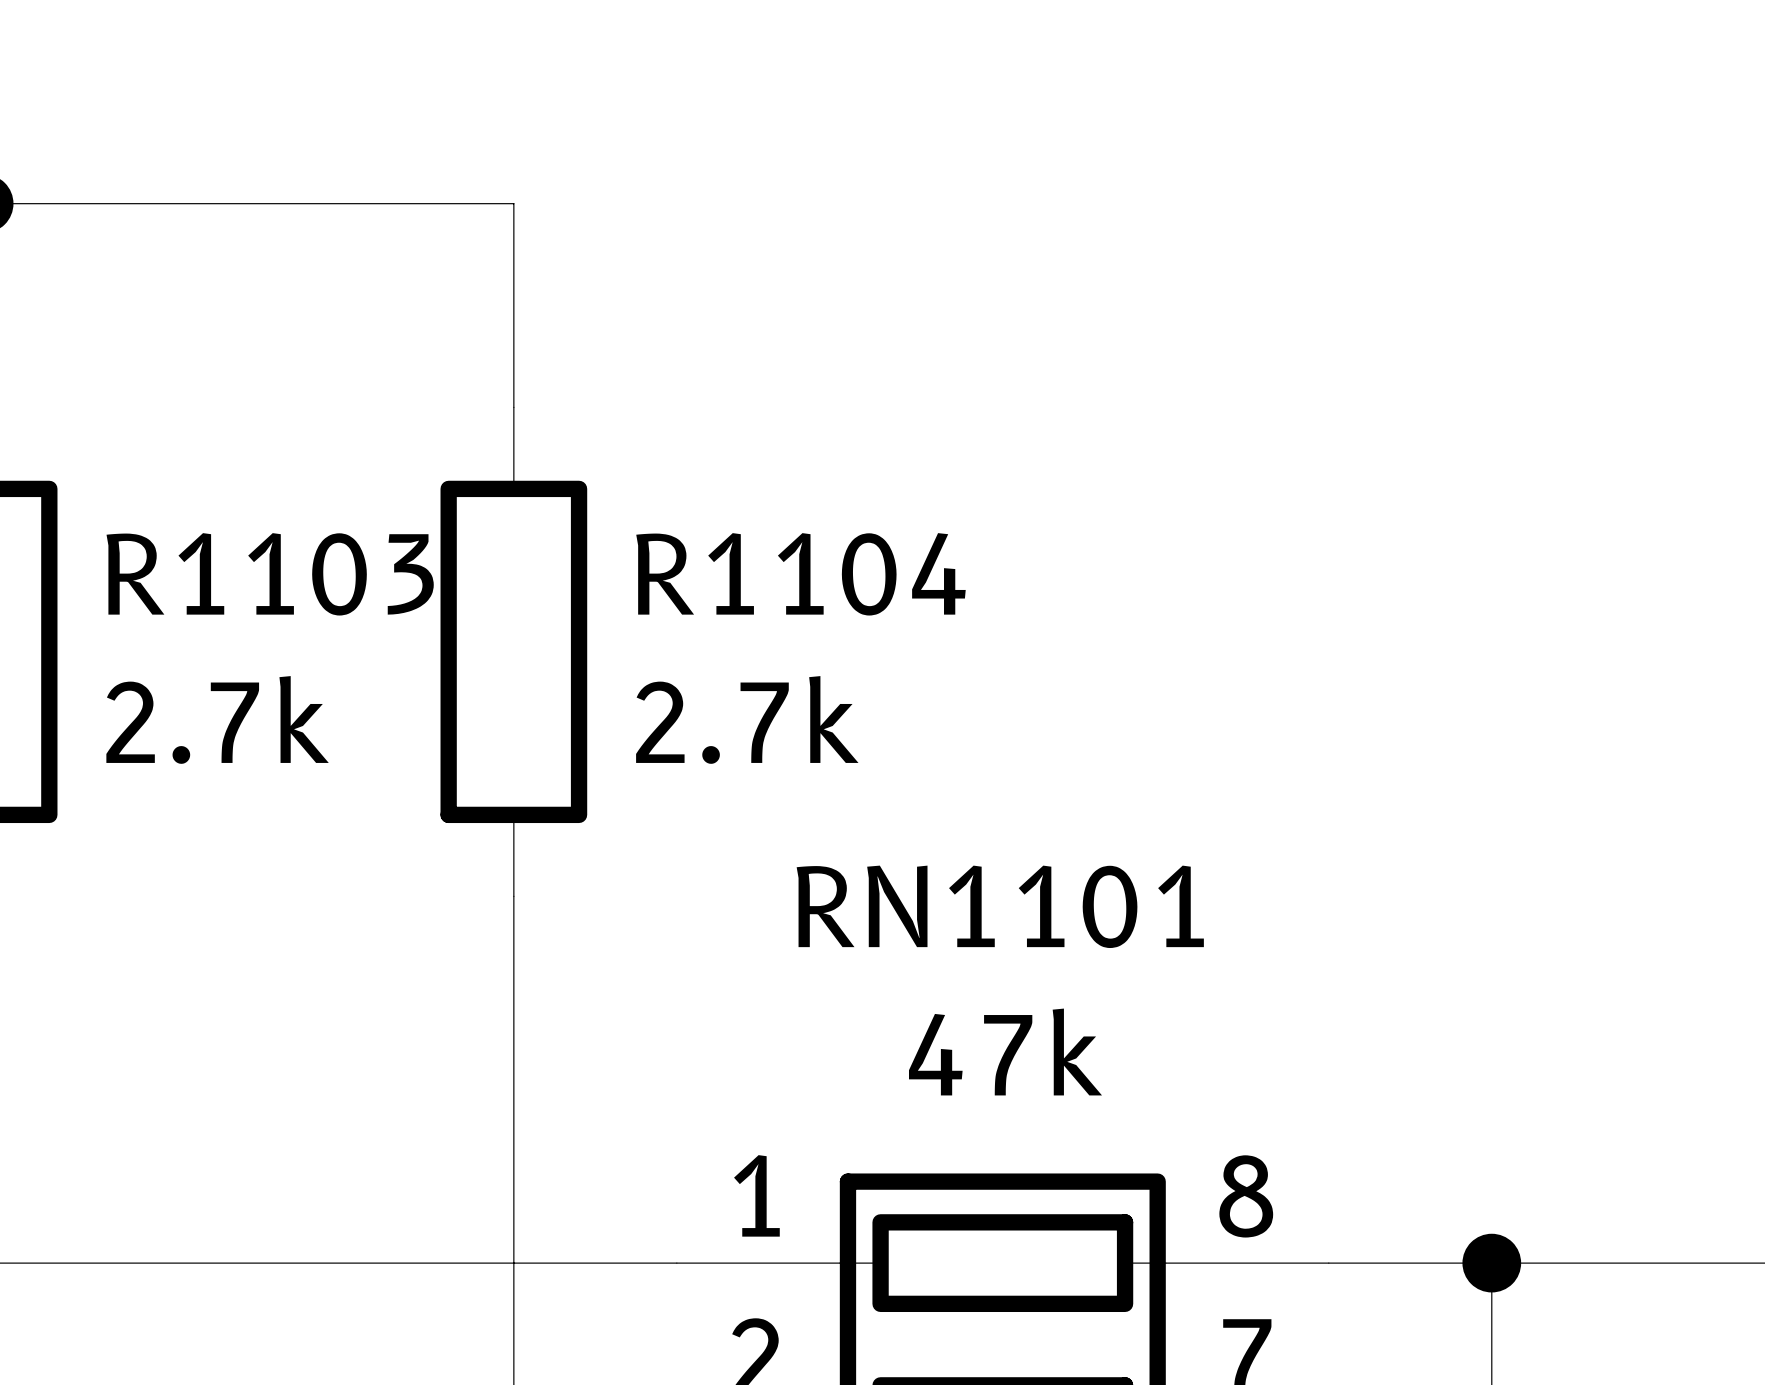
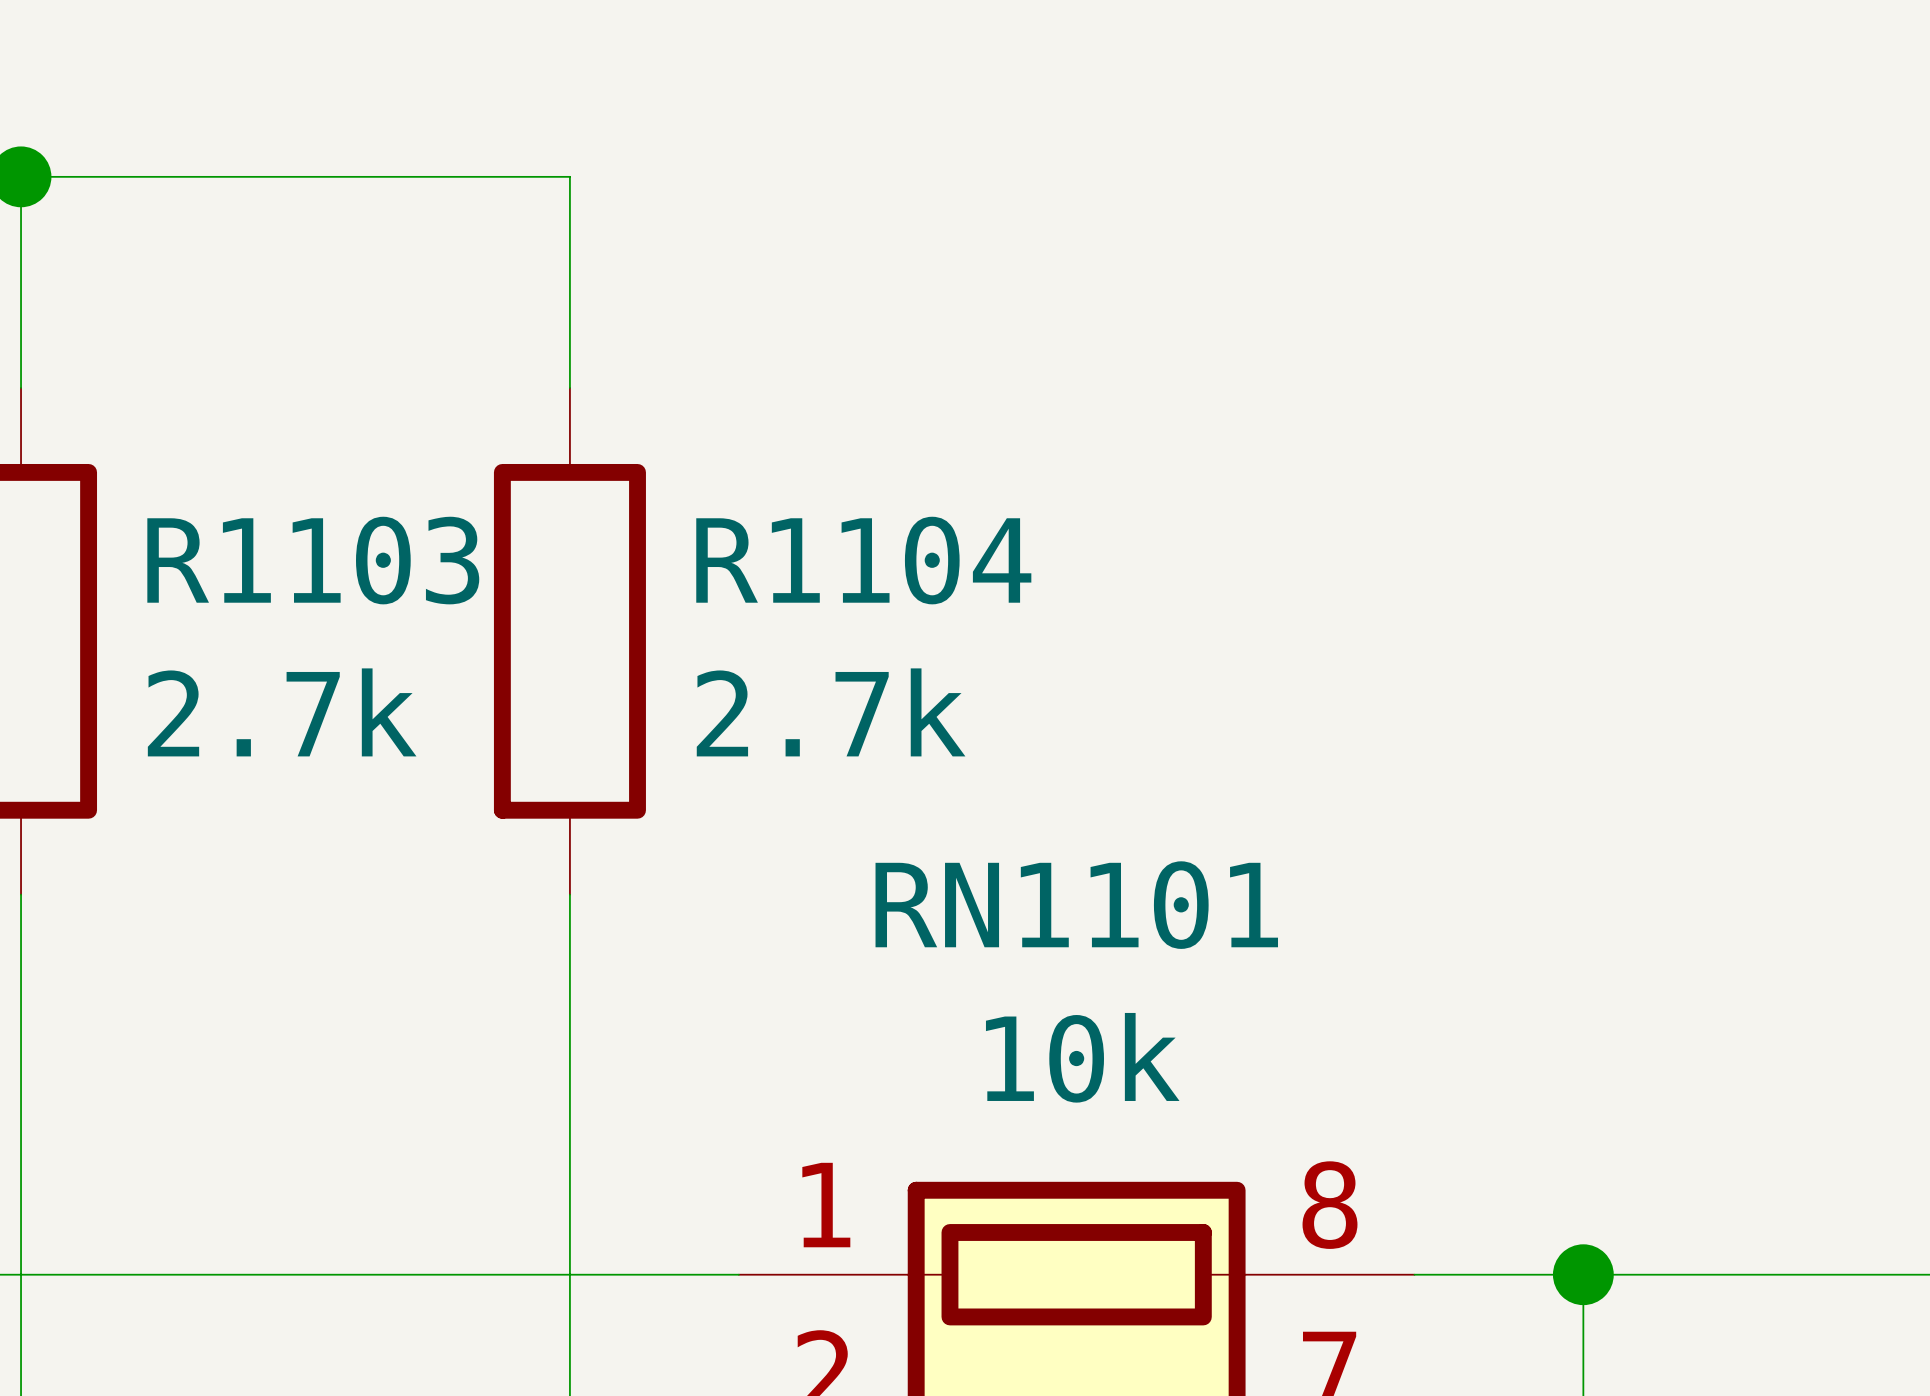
RN1101 value: 47k (1005, 1052) -> 10k (1082, 1057)

